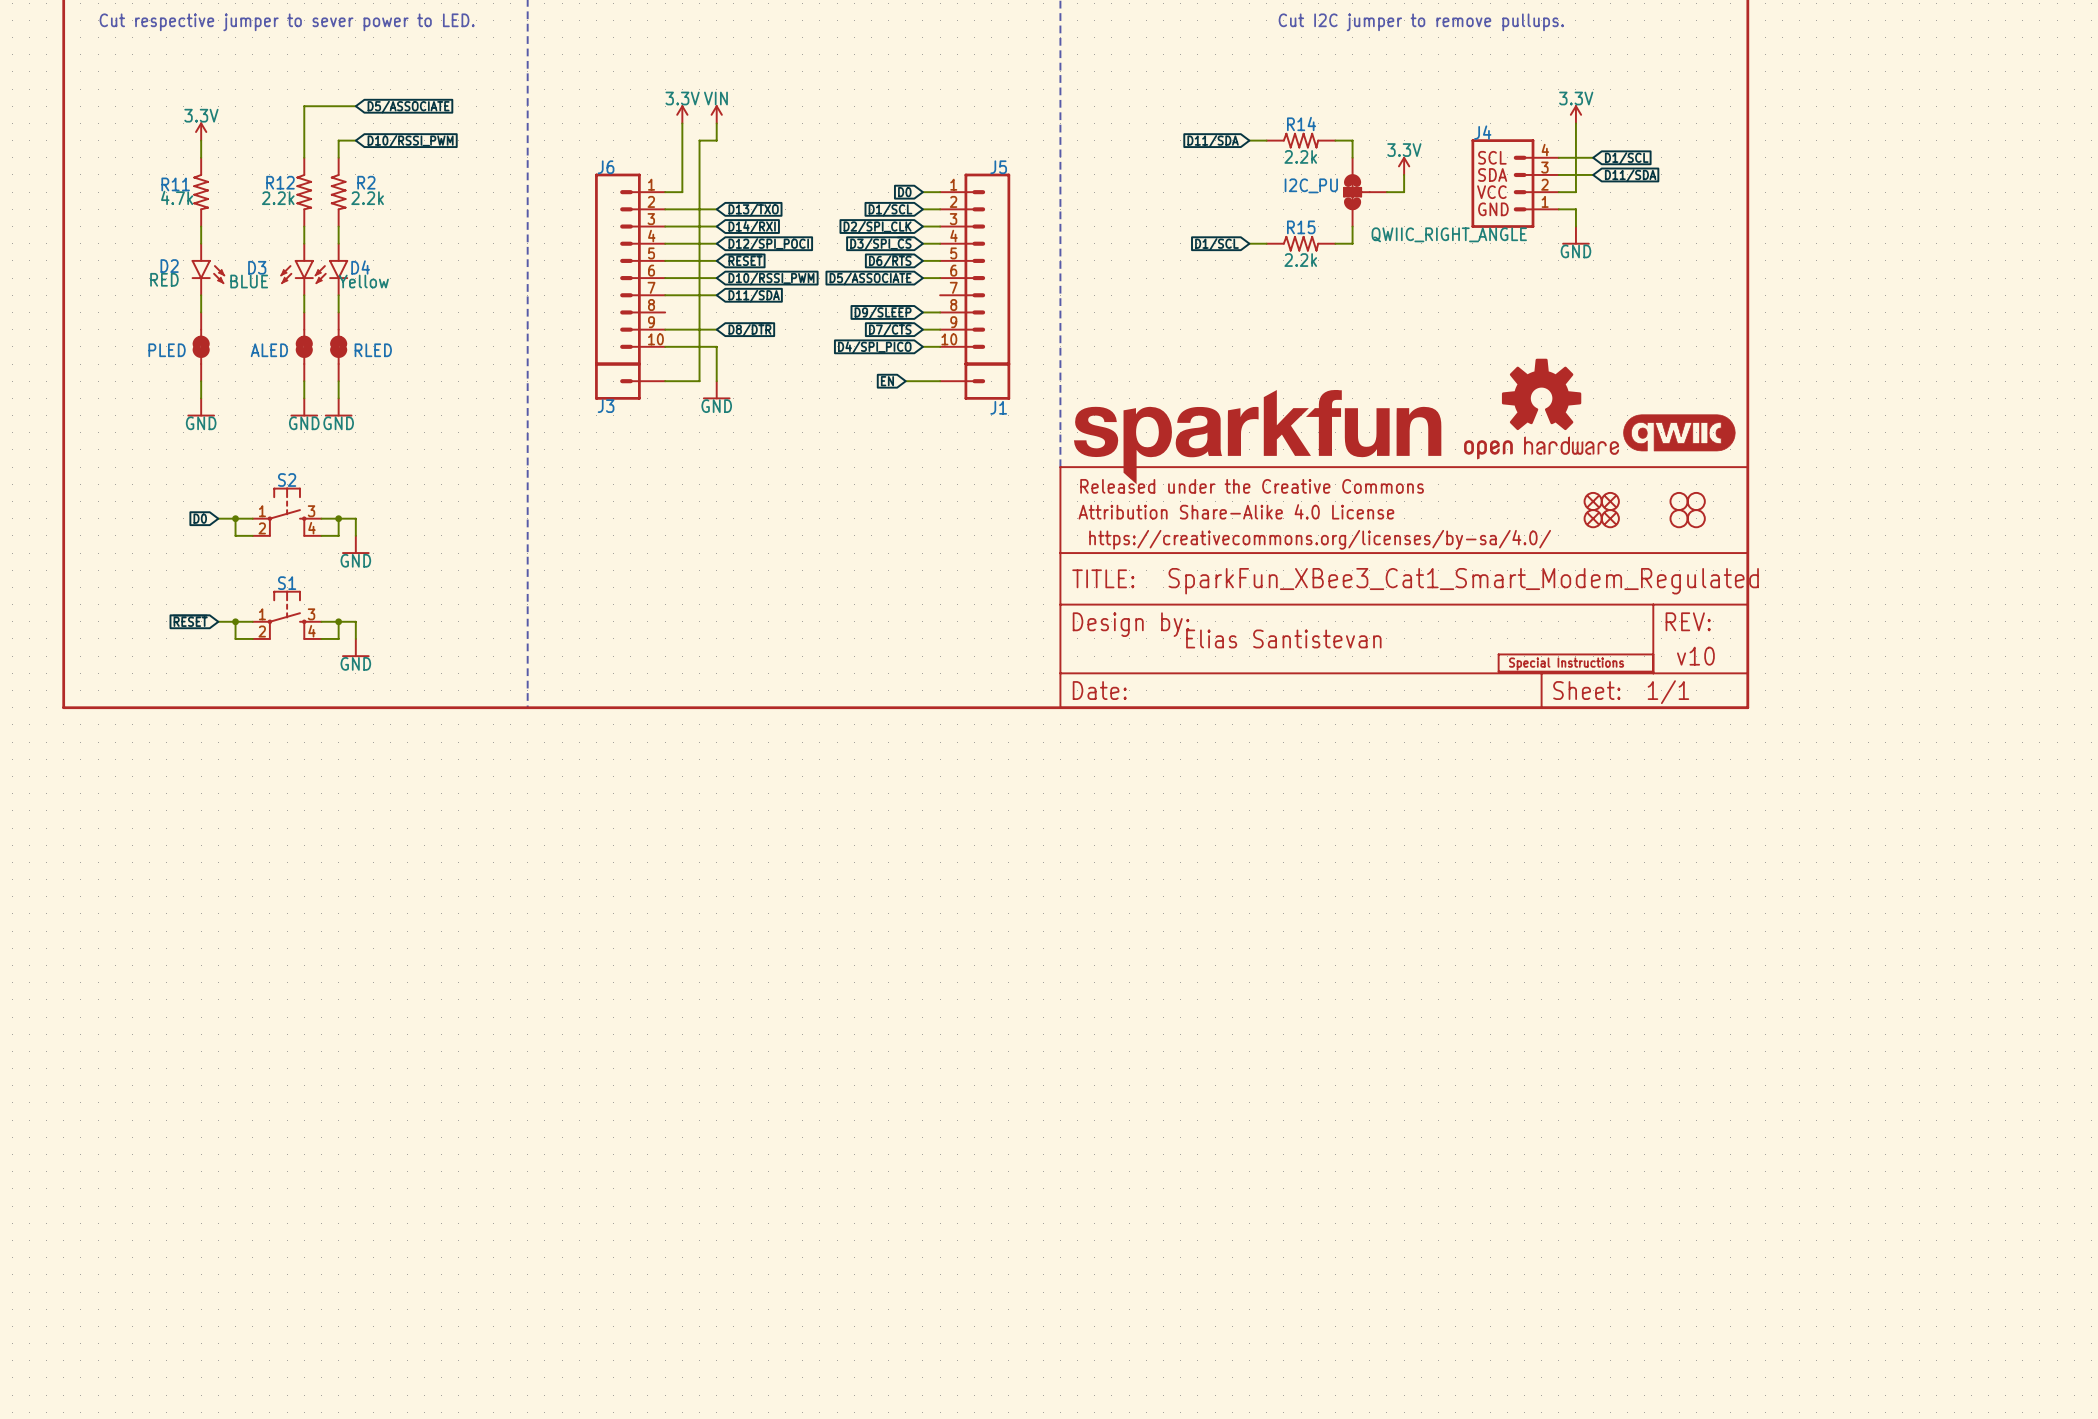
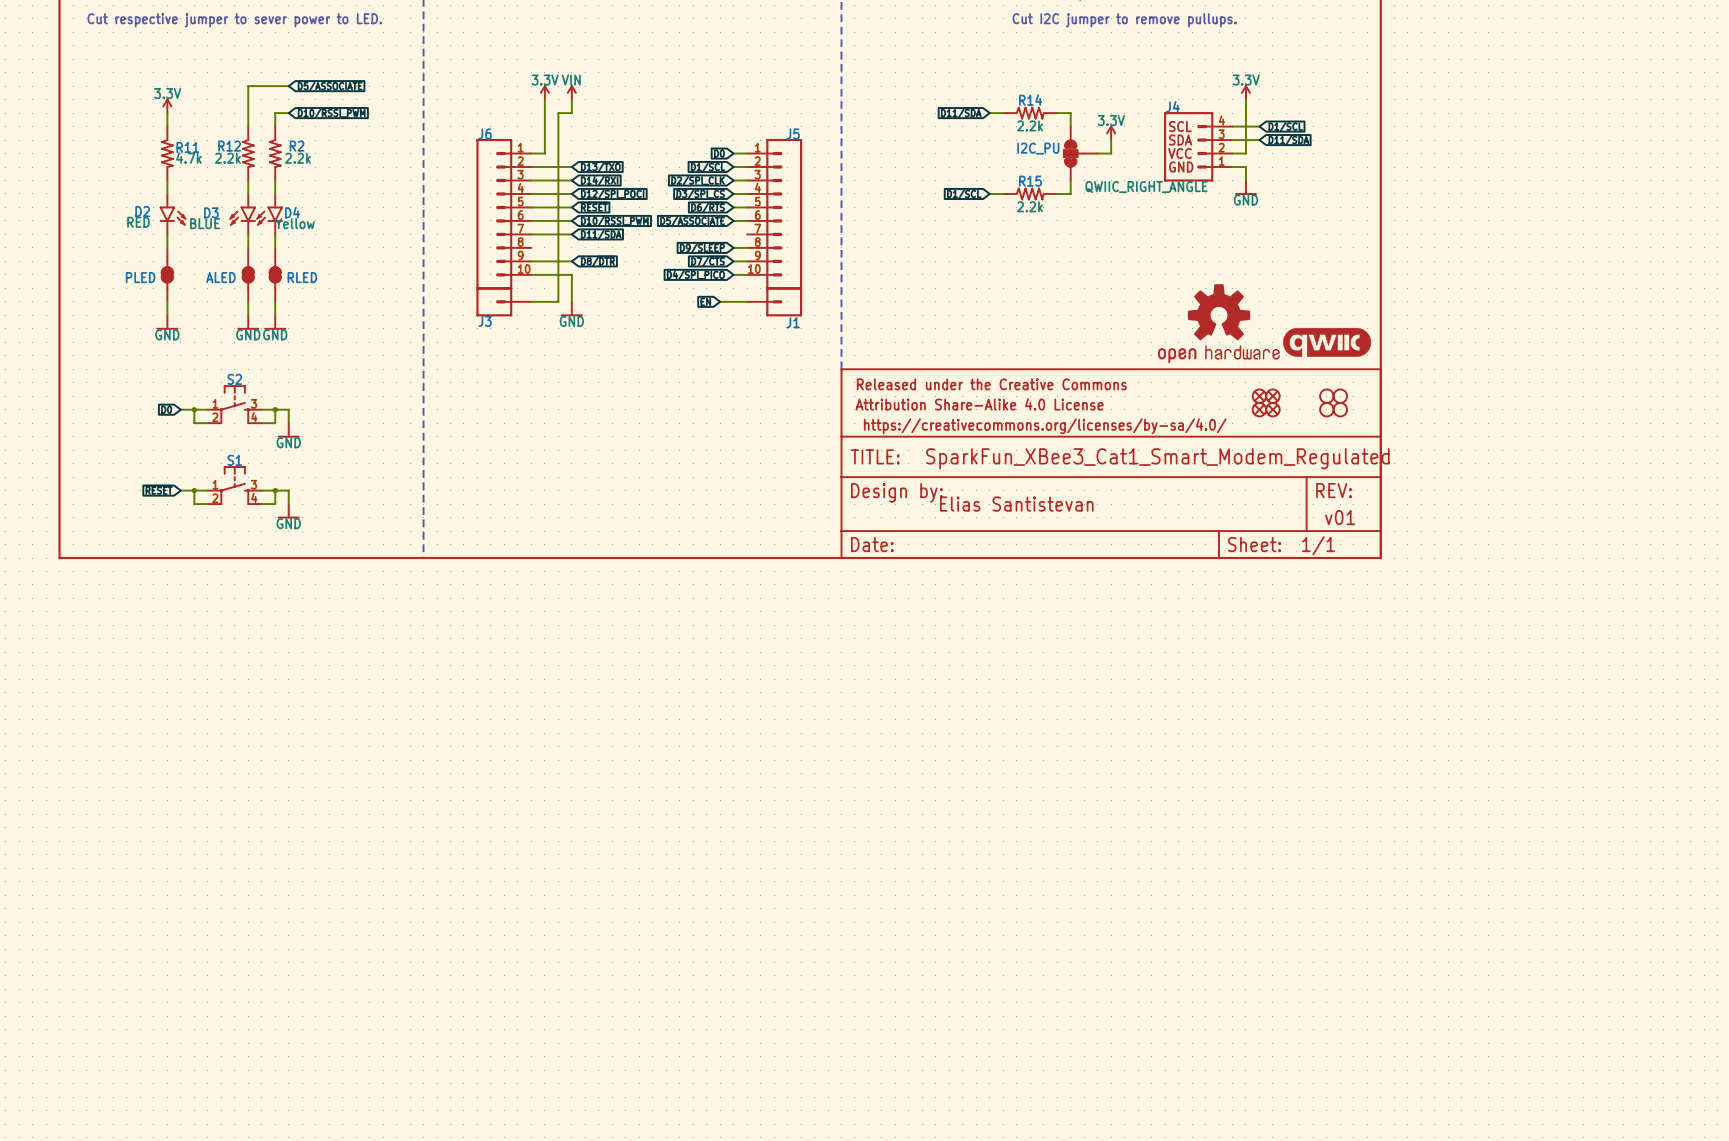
R11 name position: R11 (175, 184) -> R11 (187, 147)
R11 value position: 4.7k (177, 197) -> 4.7k (188, 158)
part: (1257, 437) -> none
text: v10 (1695, 656) -> v01 (1340, 517)
part: (1575, 663) -> none

